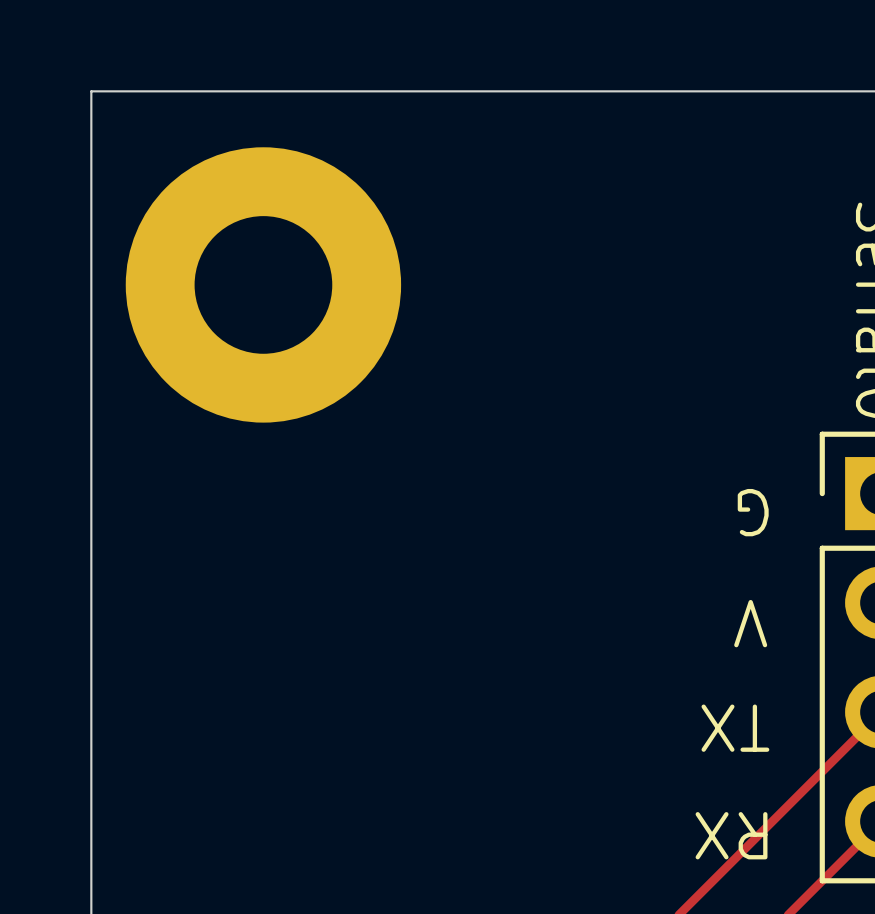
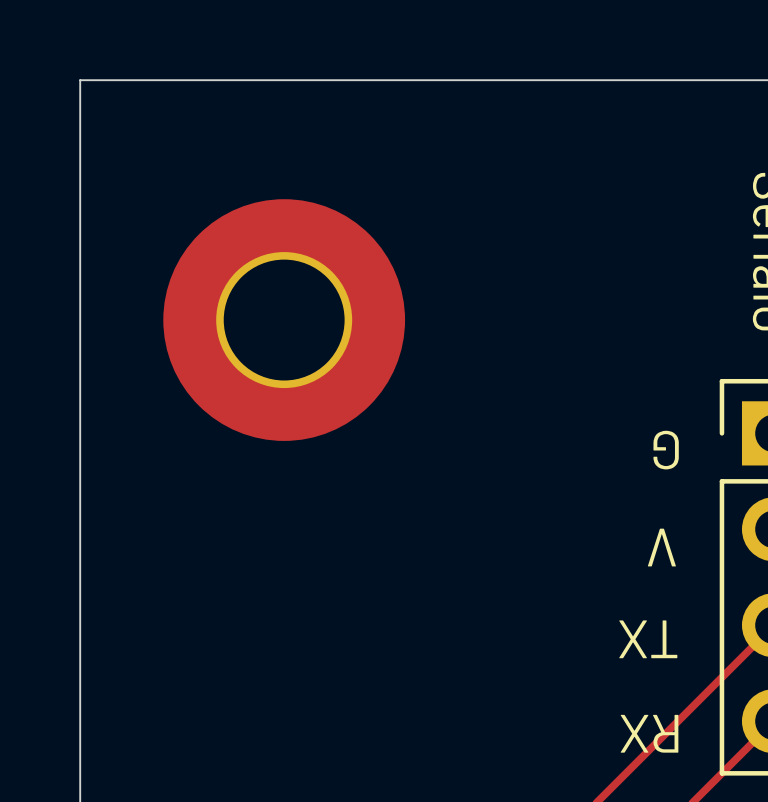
part: (263, 284) -> none
part: none -> (284, 320)

